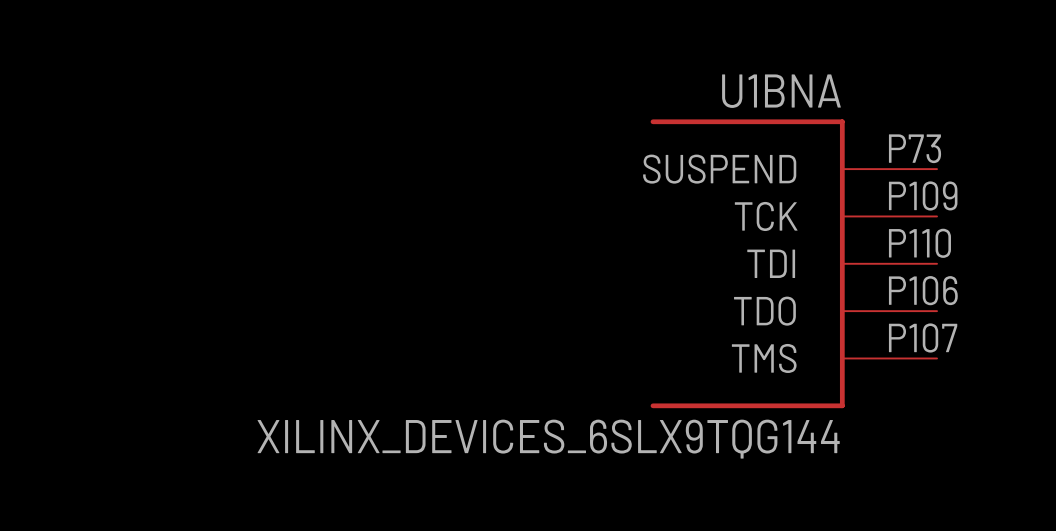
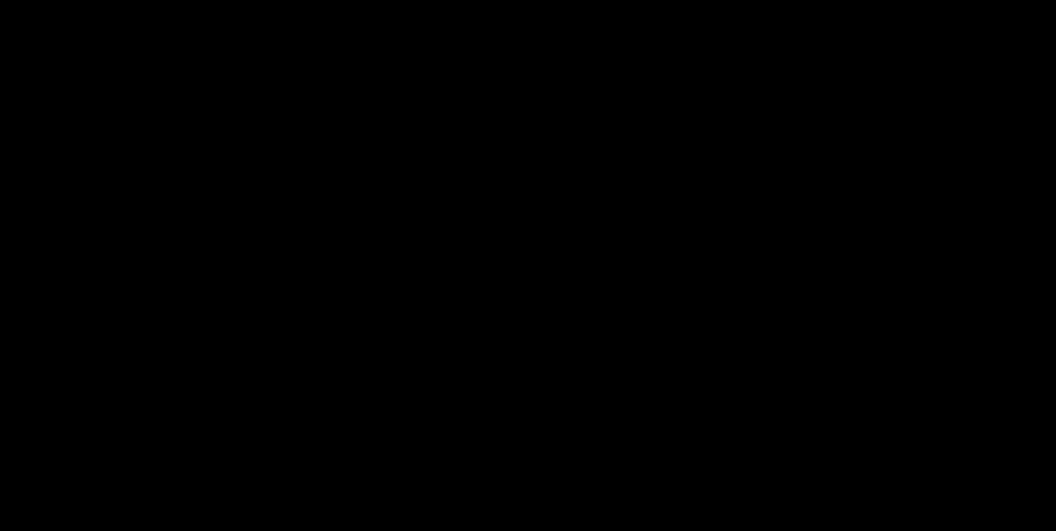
U1BNA: XILINX_DEVICES_6SLX9TQG144 (793, 263) -> none

